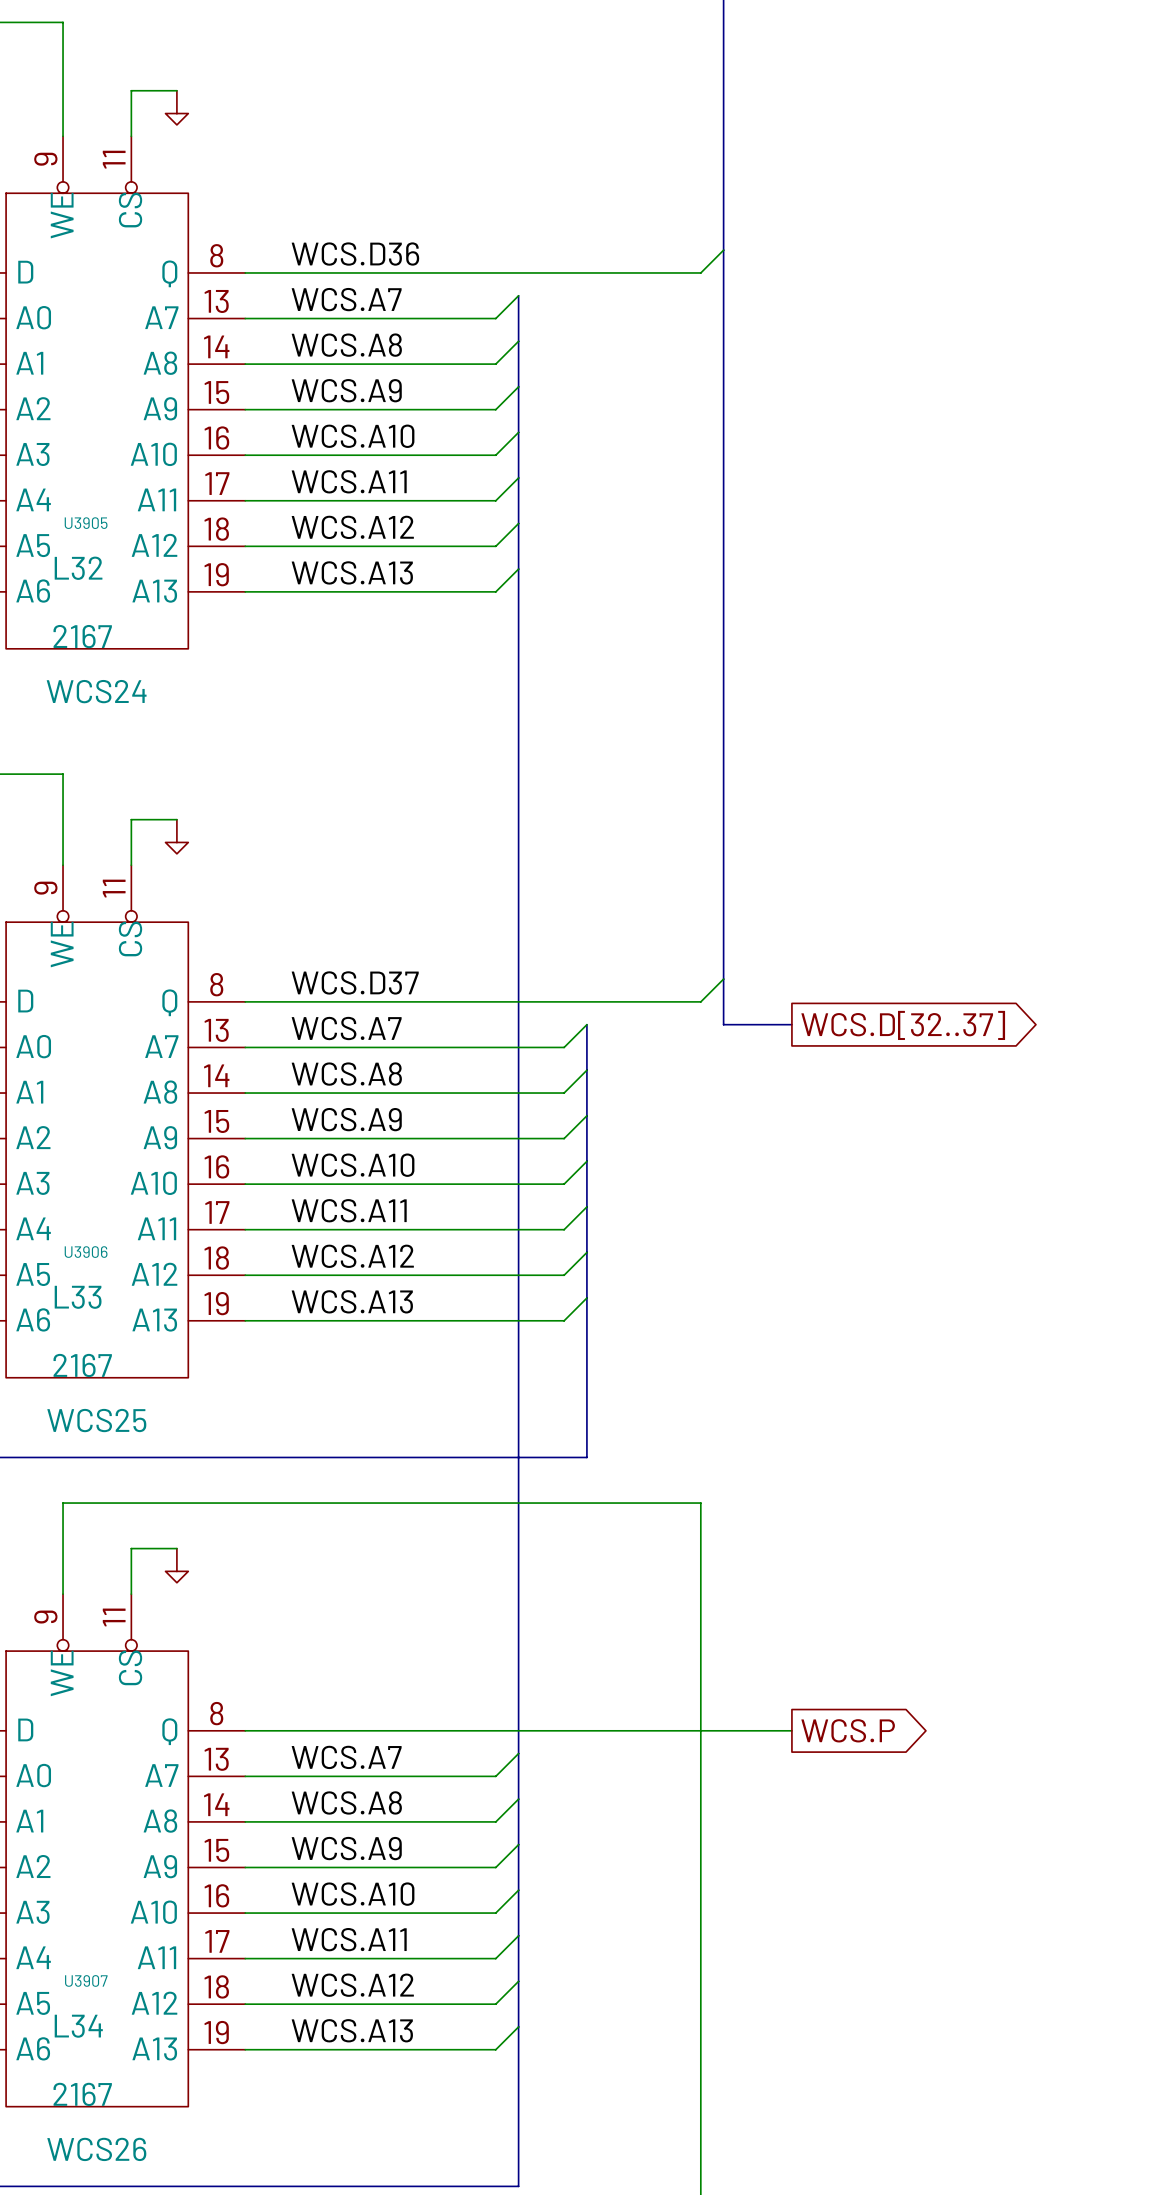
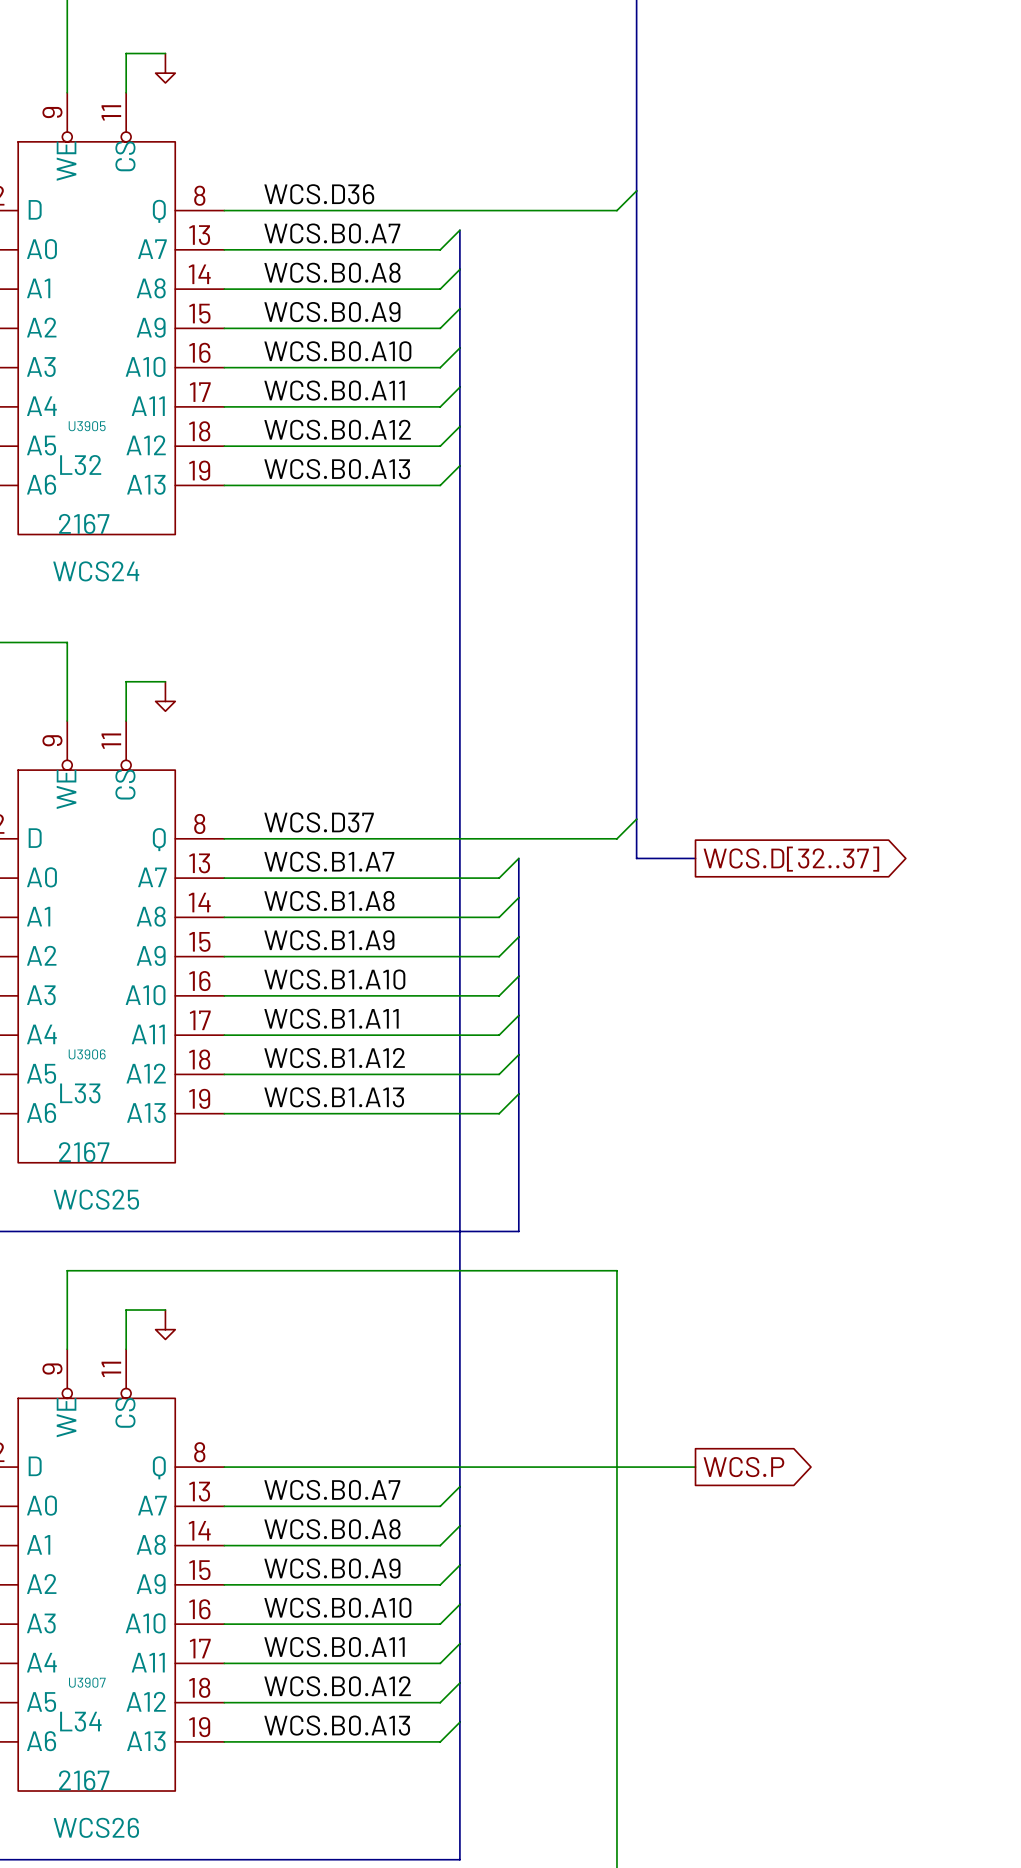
label: WCS.A7 (346, 299) -> WCS.B0.A7 (332, 233)
label: WCS.A8 (346, 345) -> WCS.B0.A8 (332, 272)
label: WCS.A9 (346, 390) -> WCS.B0.A9 (332, 312)
label: WCS.A10 (353, 436) -> WCS.B0.A10 (337, 351)
label: WCS.A11 (349, 481) -> WCS.B0.A11 (334, 390)
label: WCS.A12 (352, 527) -> WCS.B0.A12 (337, 429)
label: WCS.A13 (352, 572) -> WCS.B0.A13 (337, 469)
label: WCS.A7 (346, 1028) -> WCS.B1.A7 (329, 861)
label: WCS.A8 (346, 1074) -> WCS.B1.A8 (329, 901)
label: WCS.A9 (346, 1119) -> WCS.B1.A9 (329, 940)
label: WCS.A10 (353, 1165) -> WCS.B1.A10 (334, 979)
label: WCS.A11 (349, 1210) -> WCS.B1.A11 (331, 1018)
label: WCS.A12 (352, 1256) -> WCS.B1.A12 (334, 1058)
label: WCS.A13 (352, 1301) -> WCS.B1.A13 (334, 1097)
label: WCS.A7 (346, 1757) -> WCS.B0.A7 (332, 1490)
label: WCS.A8 (346, 1802) -> WCS.B0.A8 (332, 1529)
label: WCS.A9 (346, 1848) -> WCS.B0.A9 (332, 1568)
label: WCS.A10 (353, 1894) -> WCS.B0.A10 (337, 1607)
label: WCS.A11 (349, 1939) -> WCS.B0.A11 (334, 1647)
label: WCS.A12 (352, 1985) -> WCS.B0.A12 (337, 1686)
label: WCS.A13 (352, 2030) -> WCS.B0.A13 (337, 1725)

